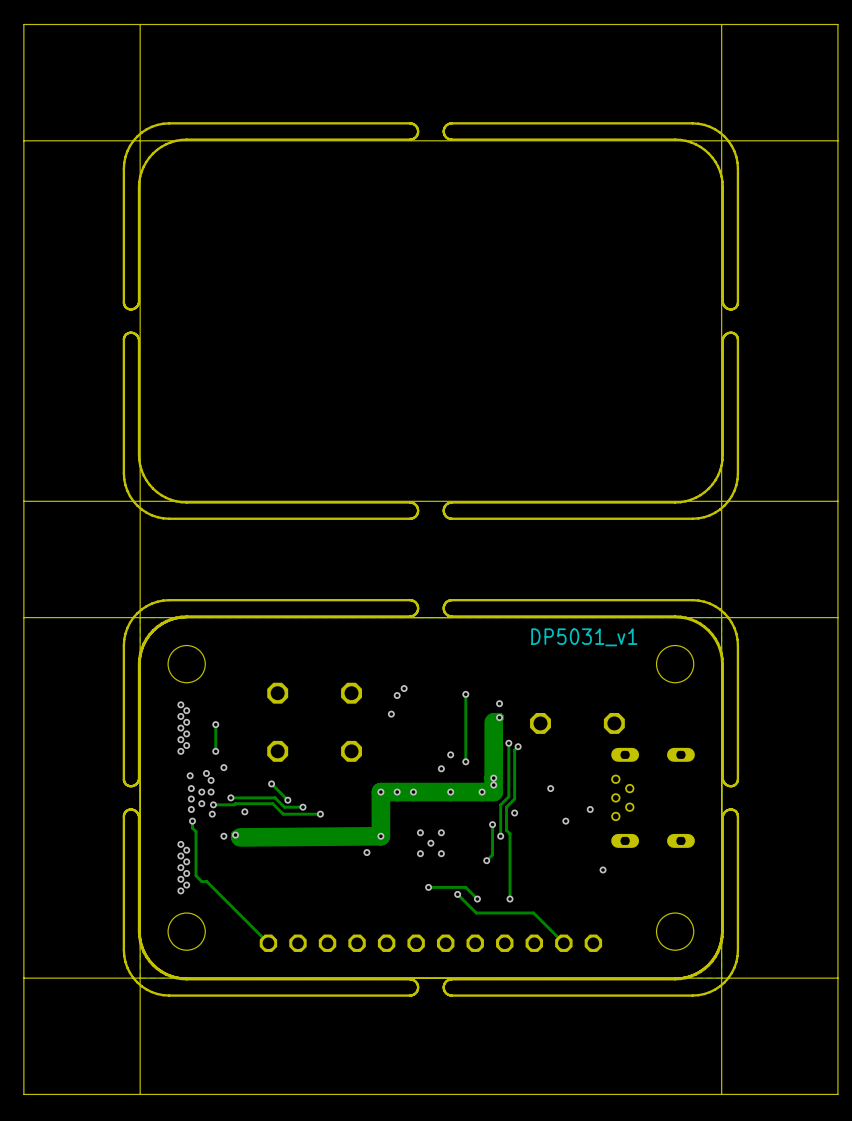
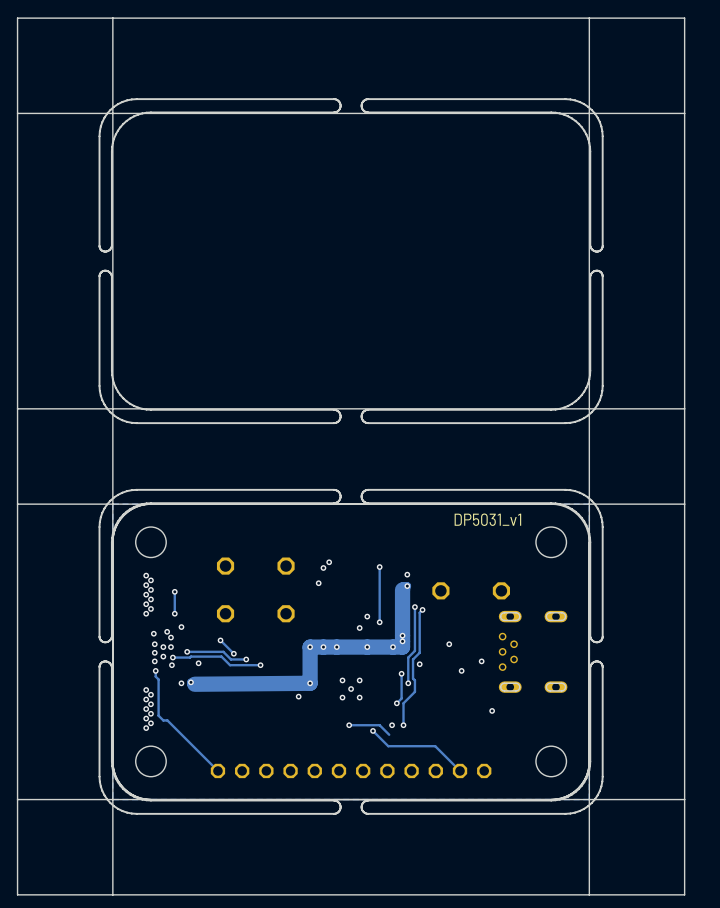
track: (508, 832) (509, 899) -> (414, 680) (414, 691) (403, 703) (403, 725)
via: none -> (392, 725)
via: none -> (403, 725)
via: (477, 899) -> none
via: (509, 899) -> none

